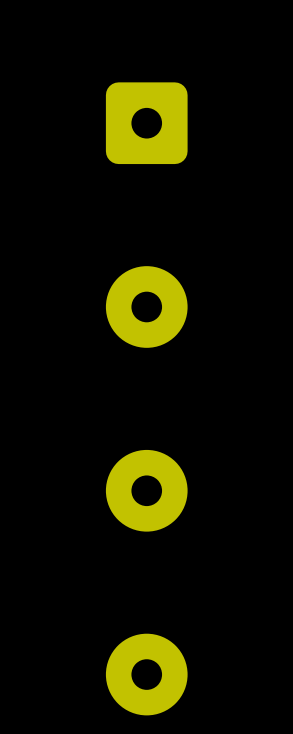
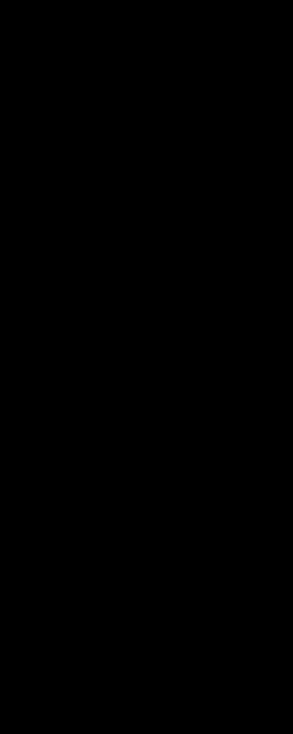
part: (146, 398) -> none

